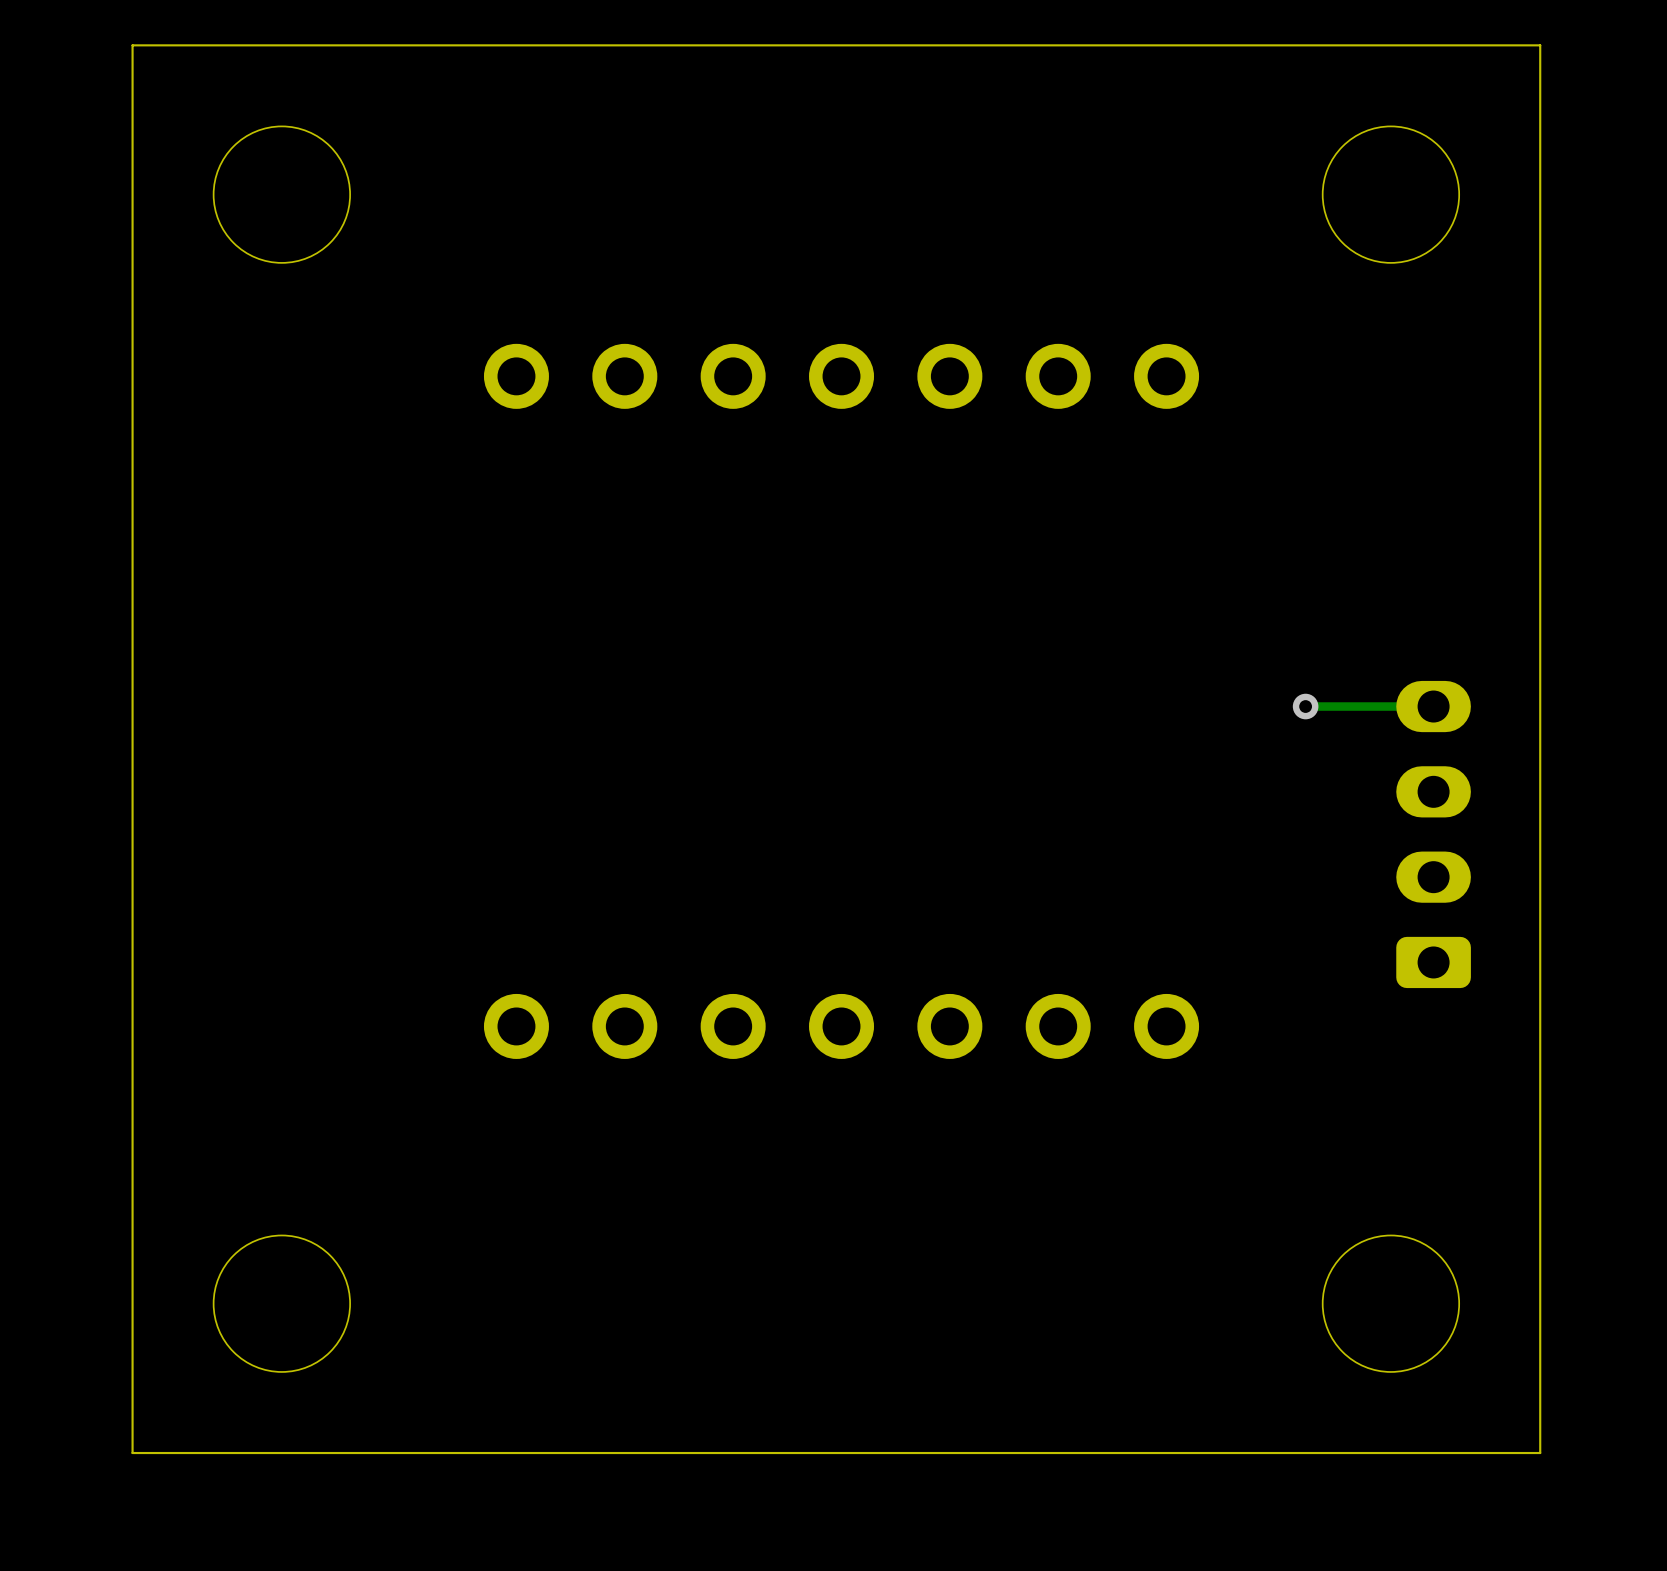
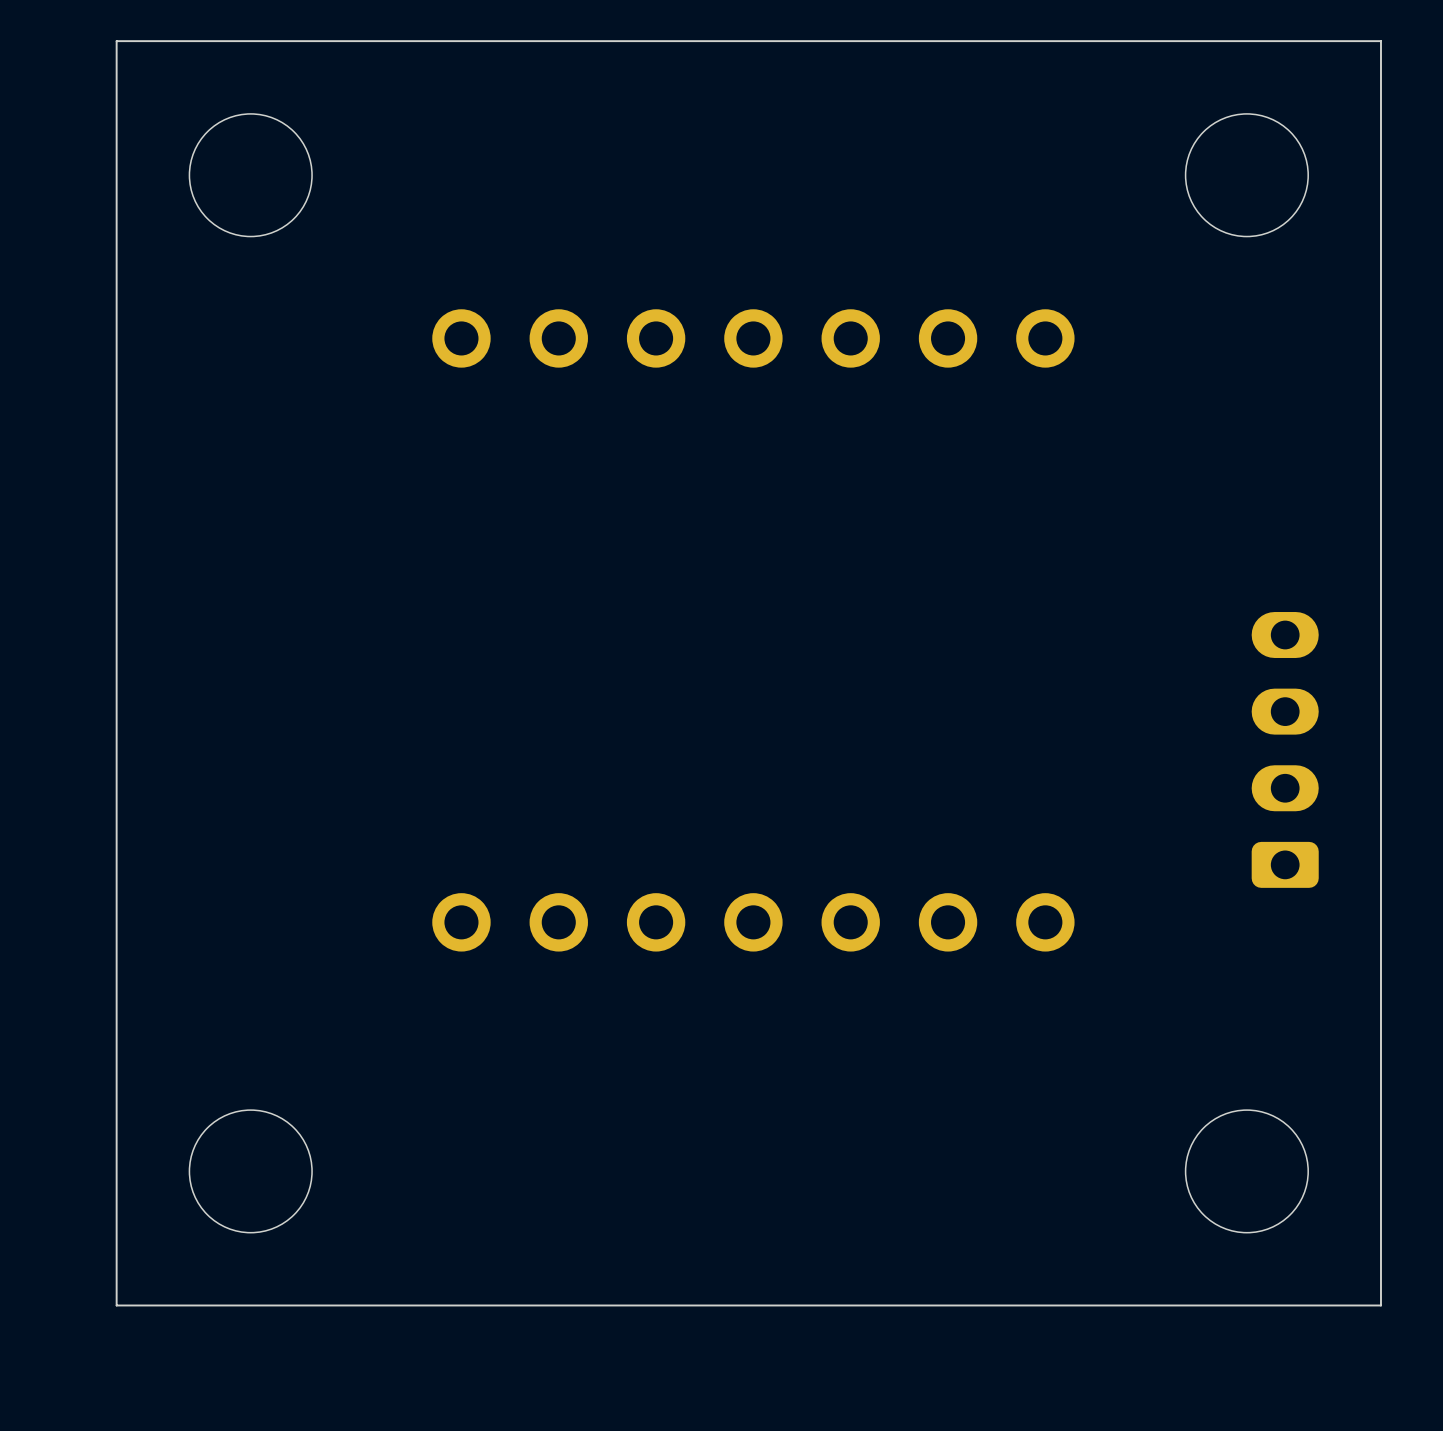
via: (1305, 706) -> none
track: (1433, 706) (1305, 706) -> none

